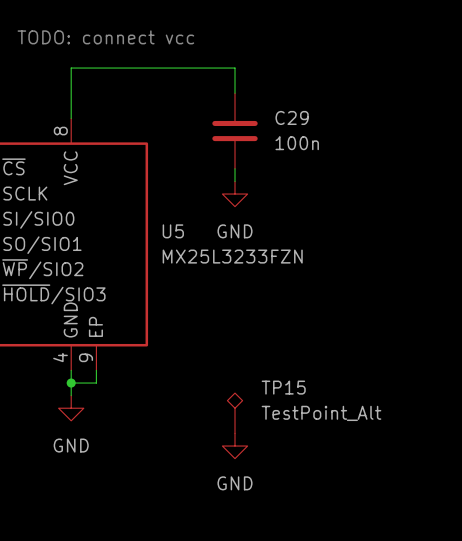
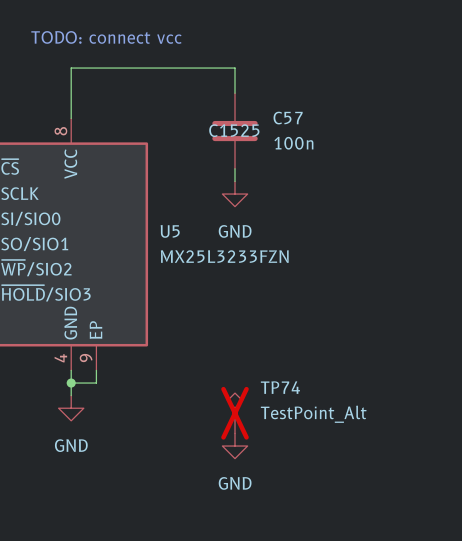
C29 name: C29 (292, 117) -> C57 (288, 118)
C29 text: none -> C1525 (234, 130)
TP15 name: TP15 (283, 387) -> TP74 (280, 387)
TP15 do-not-place cross: none -> (235, 413)

